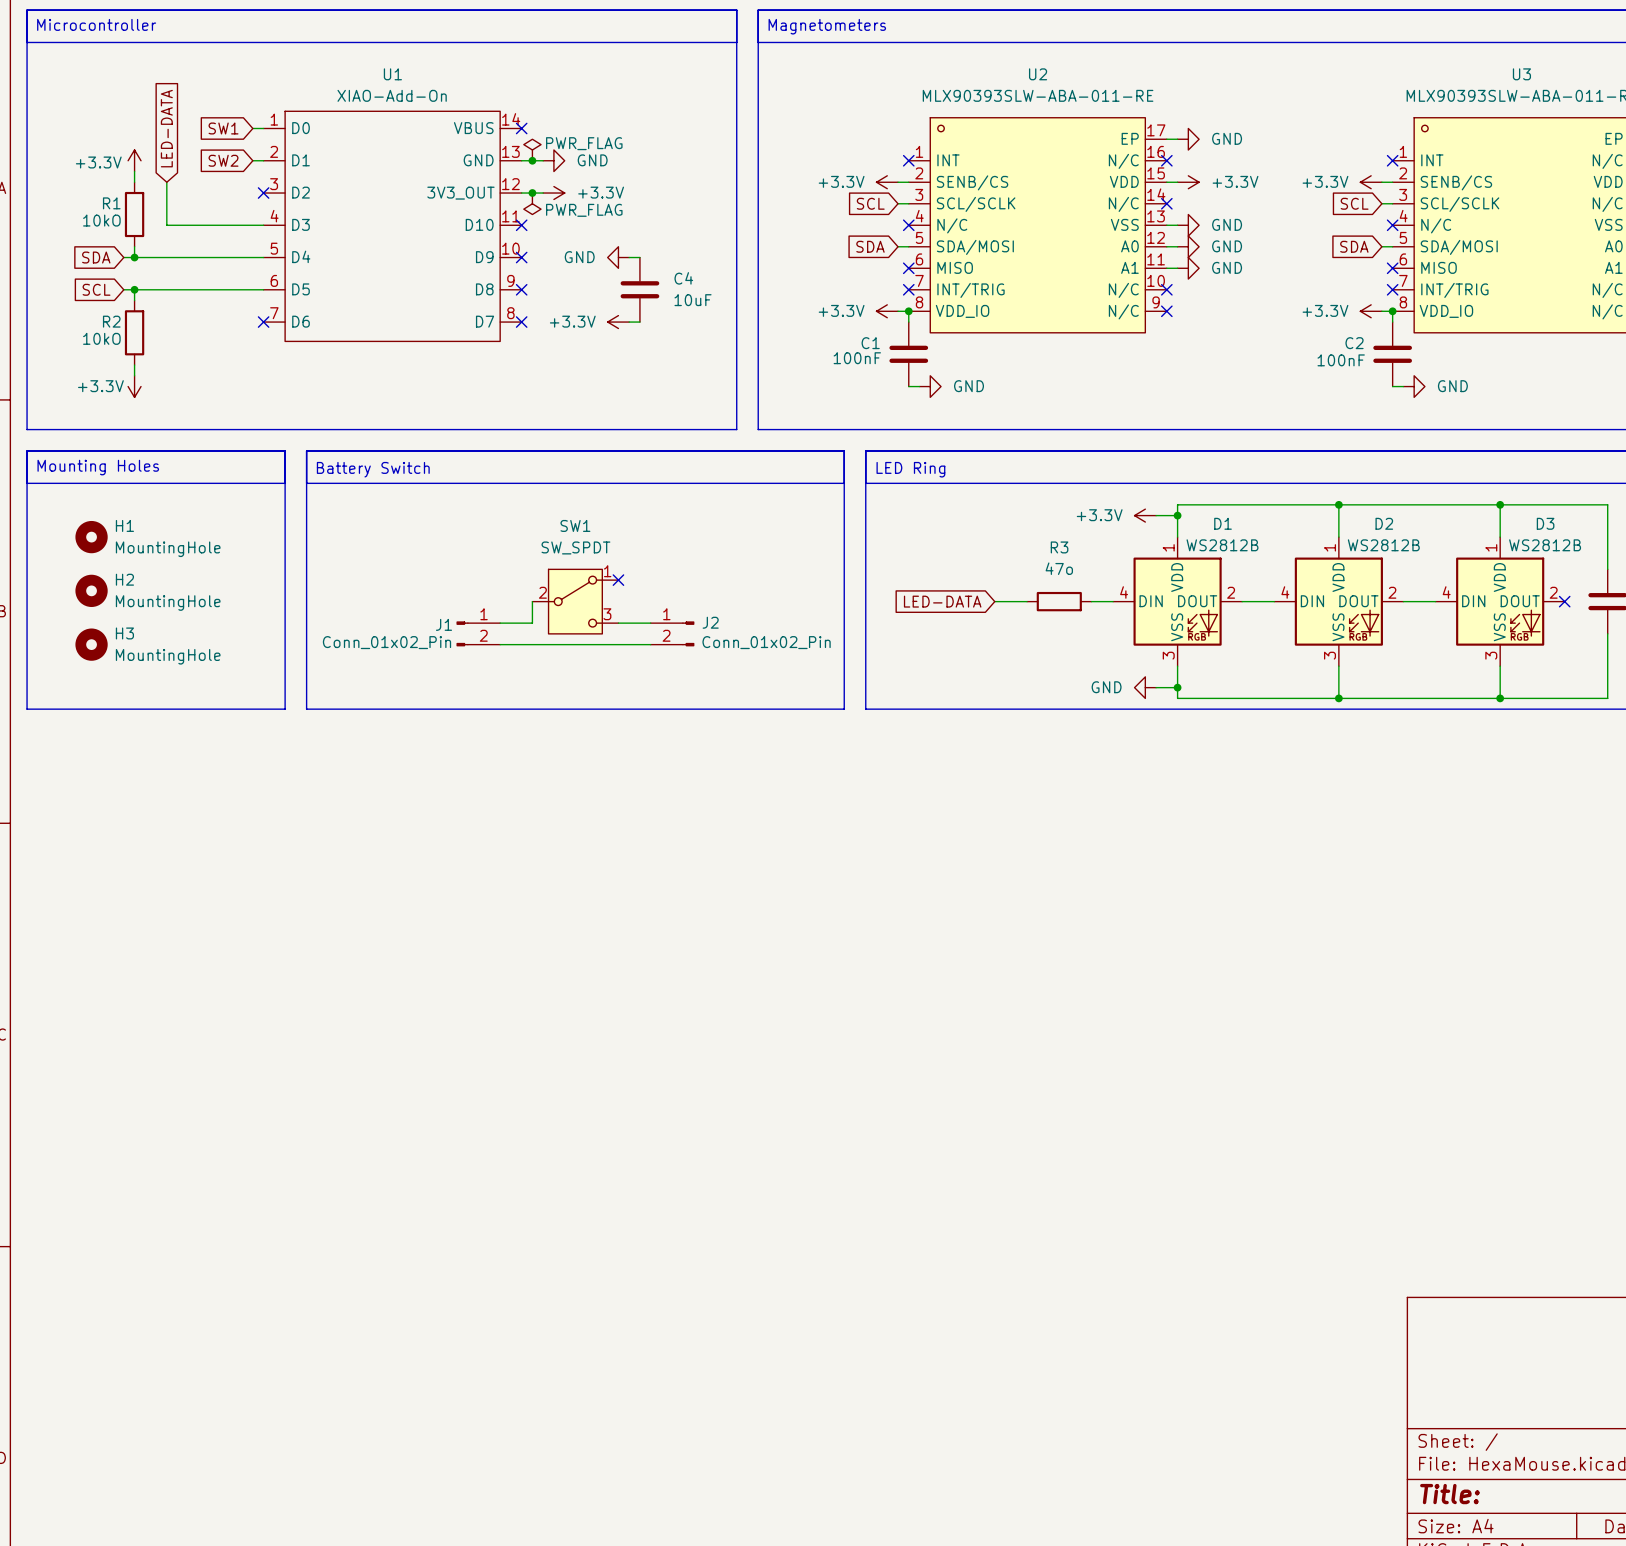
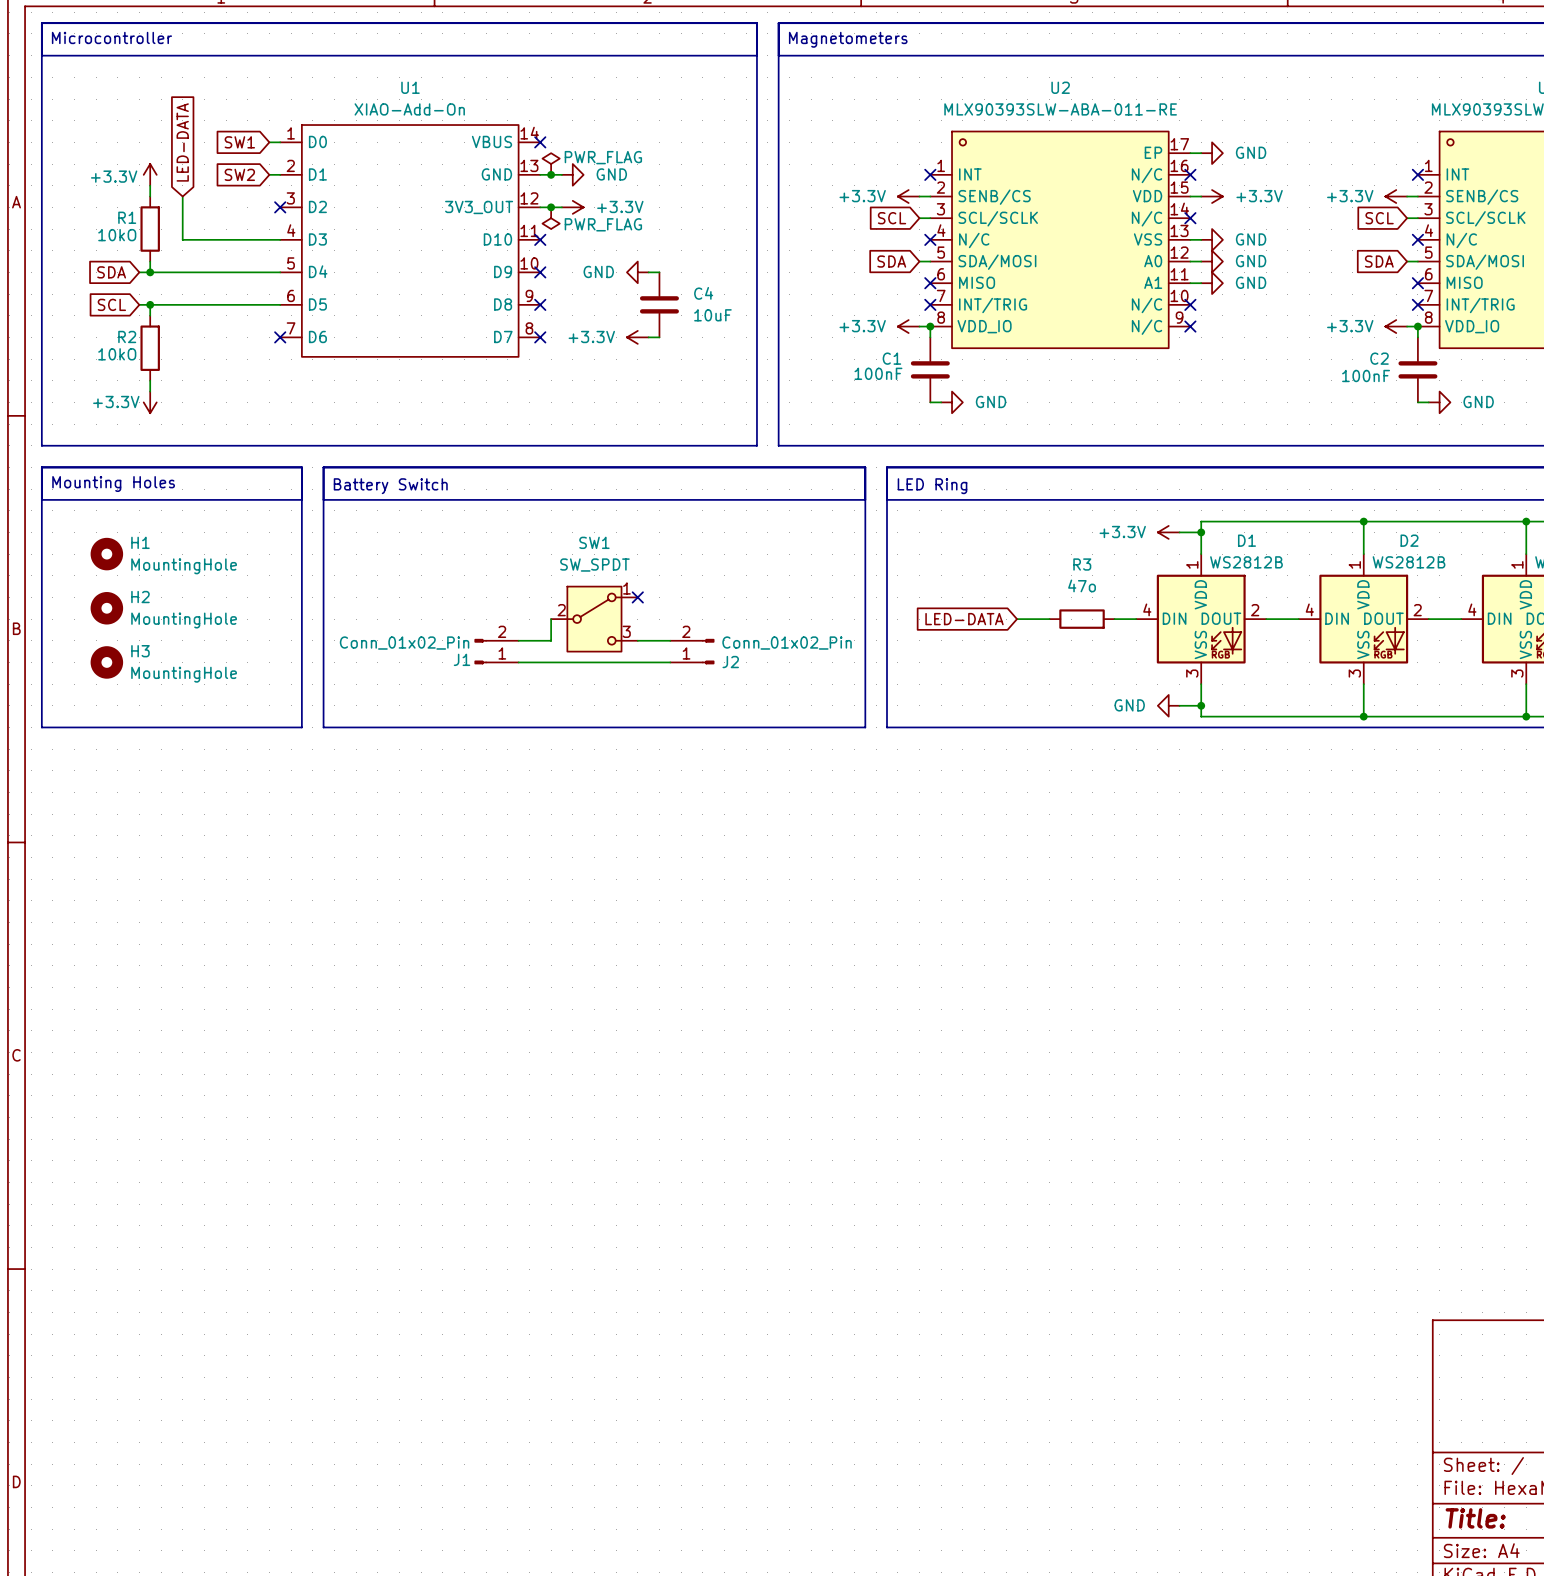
J1 flip: as is (462, 633) -> up-down (480, 651)
J2 flip: as is (688, 633) -> up-down (708, 651)

